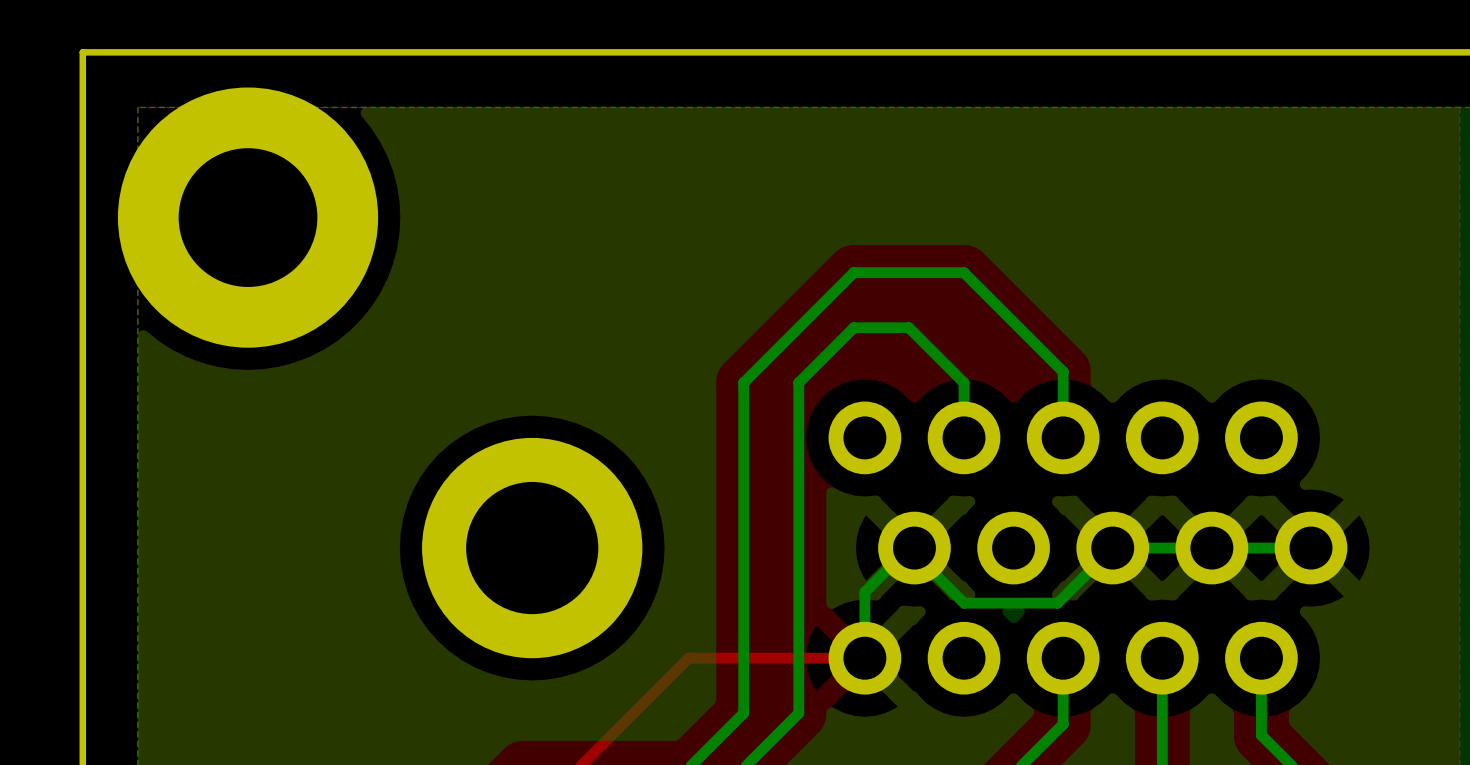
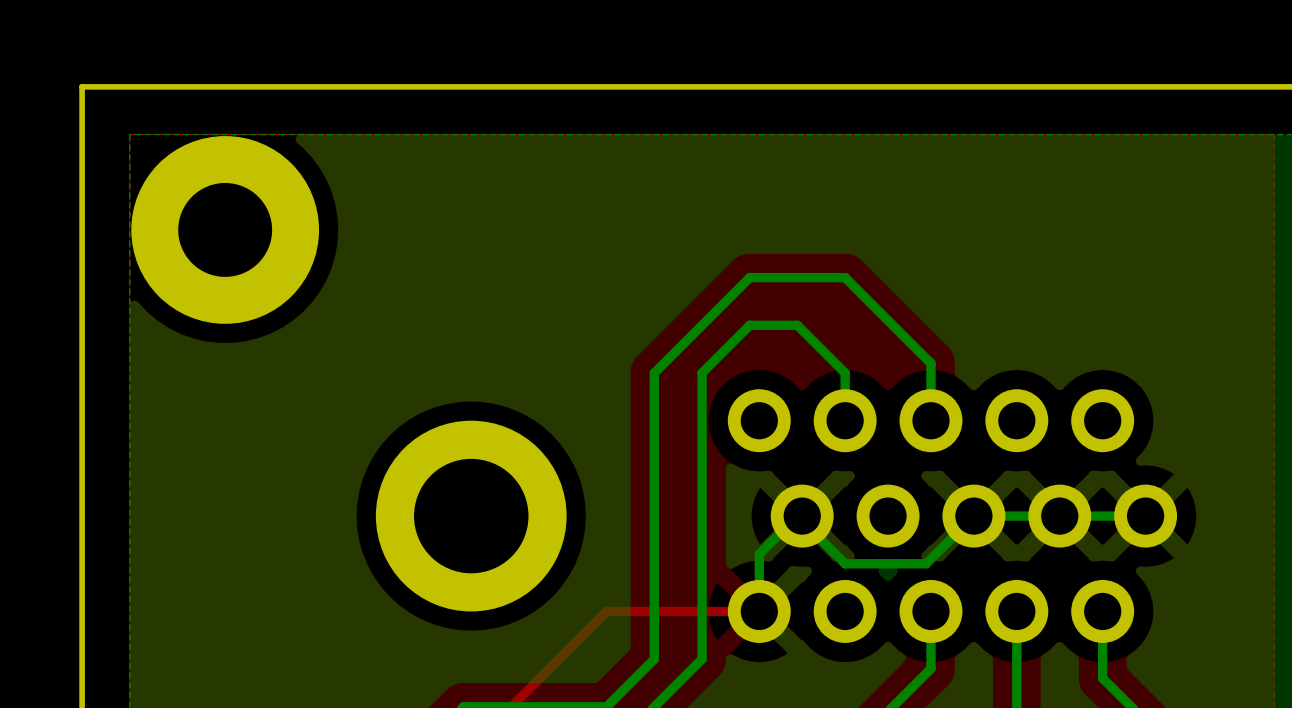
part footprint: [117, 87, 379, 348] -> [131, 136, 320, 324]

